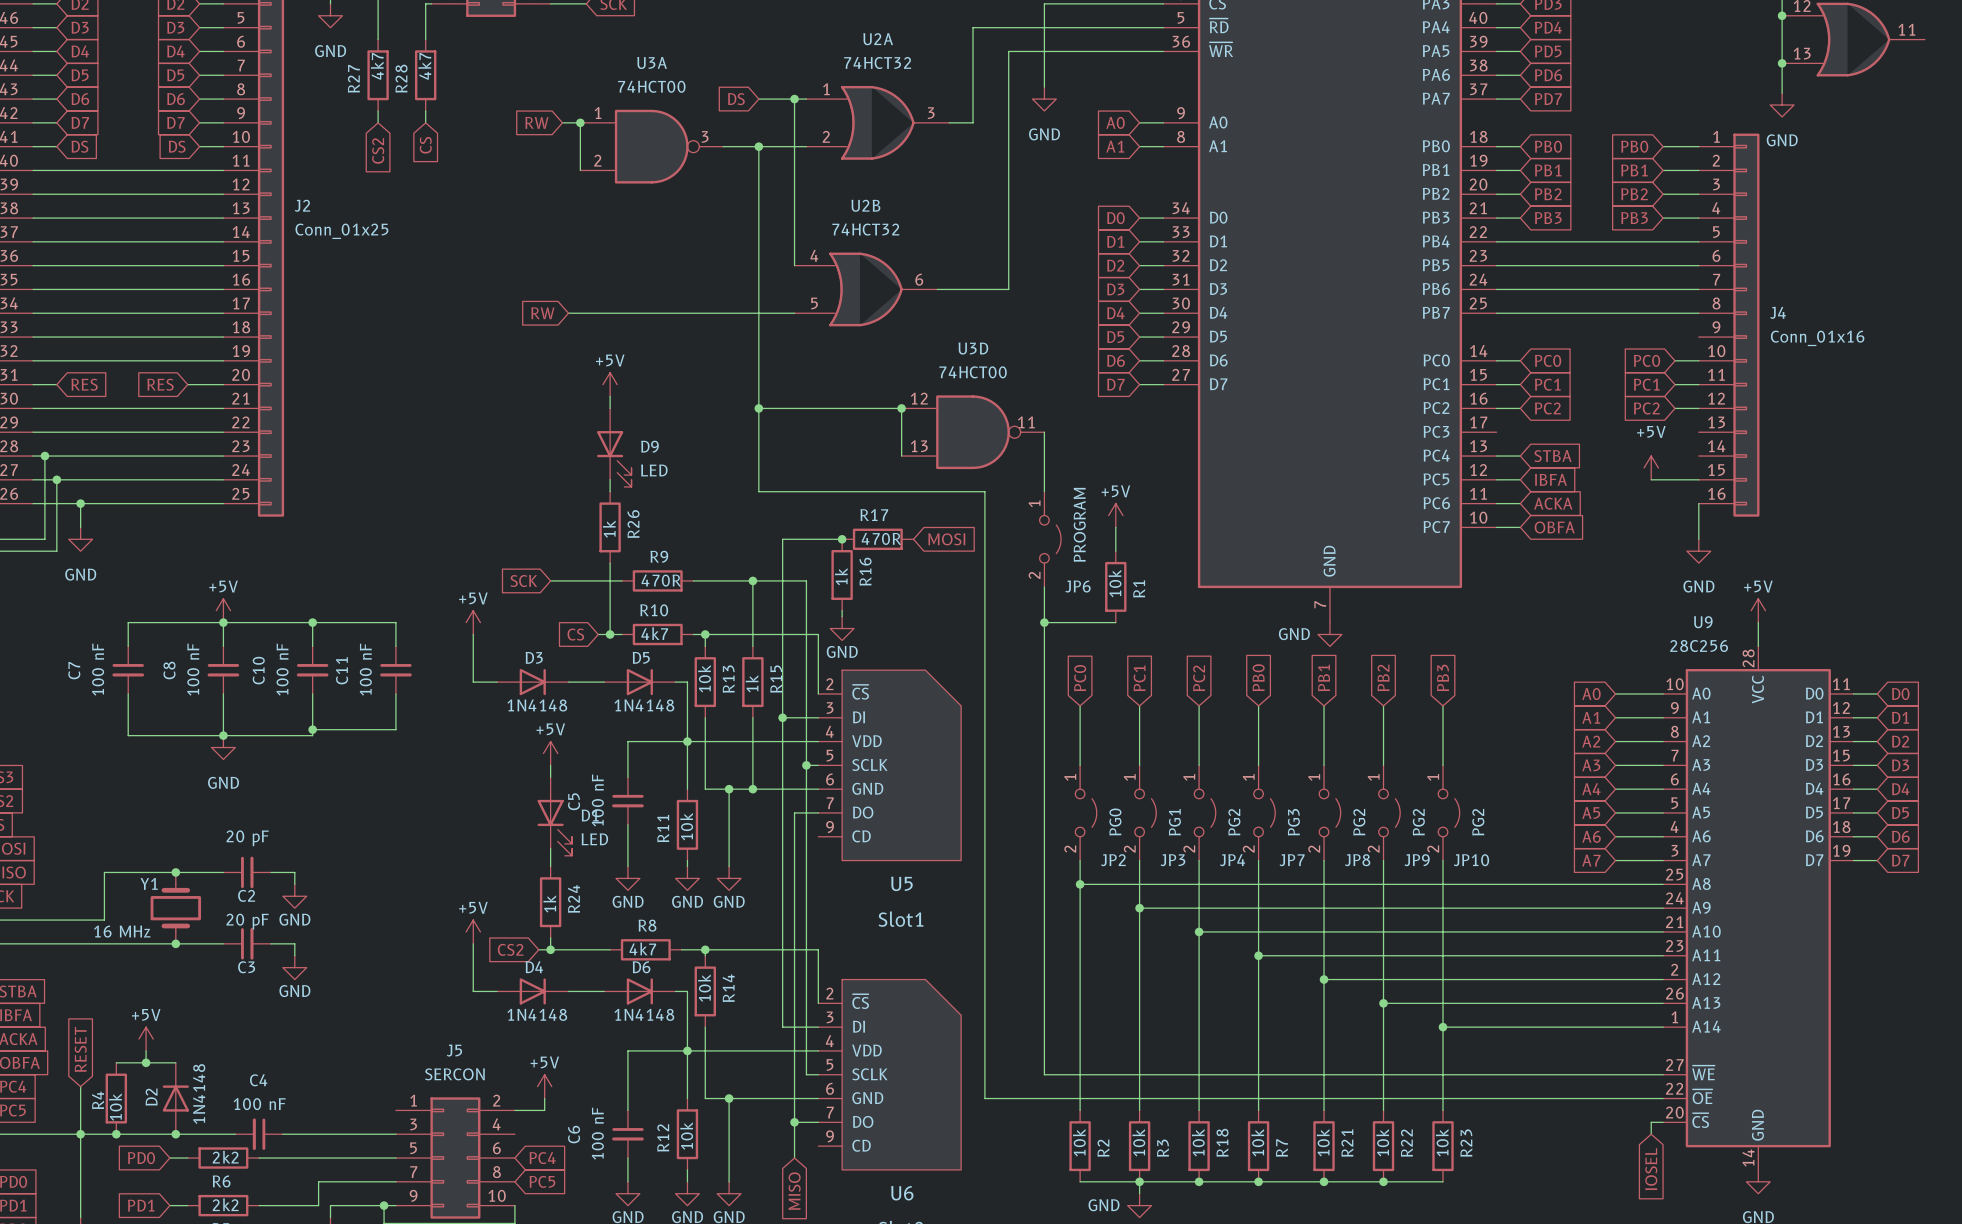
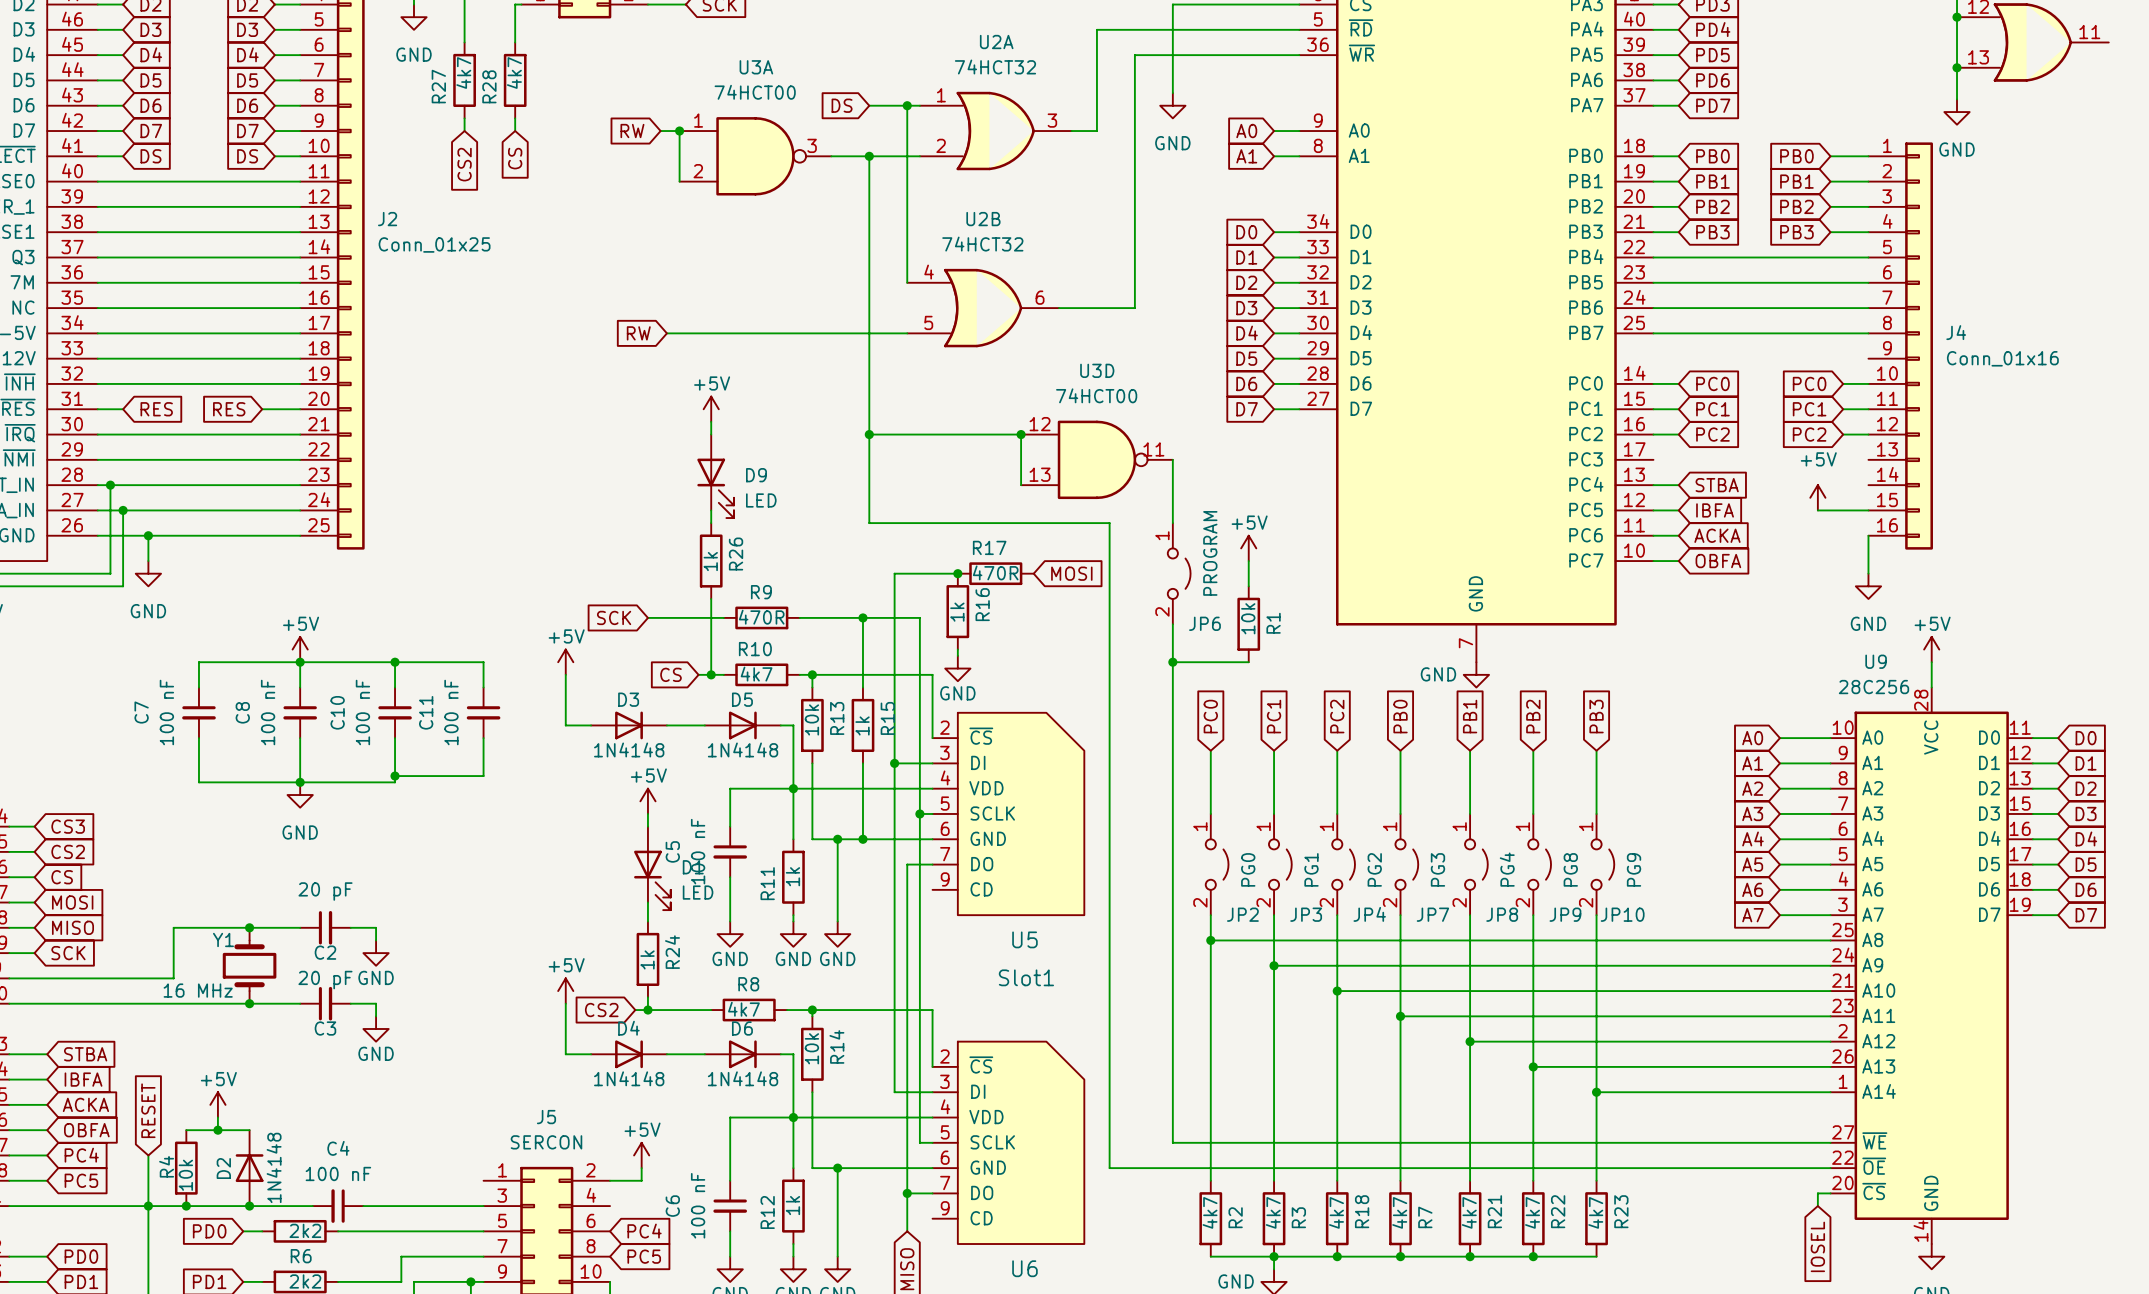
JP8 value: PG2 (1359, 822) -> PG4 (1507, 869)
JP9 value: PG2 (1418, 822) -> PG8 (1570, 869)
JP10 value: PG2 (1478, 822) -> PG9 (1634, 869)
R11 value: 10k (686, 826) -> 1k (792, 876)
R12 value: 10k (686, 1136) -> 1k (792, 1205)
R2 value: 10k (1079, 1142) -> 4k7 (1210, 1212)
R3 value: 10k (1138, 1142) -> 4k7 (1273, 1212)
R18 value: 10k (1198, 1142) -> 4k7 (1336, 1212)
R7 value: 10k (1257, 1142) -> 4k7 (1399, 1212)
R21 value: 10k (1323, 1142) -> 4k7 (1469, 1212)
R22 value: 10k (1382, 1142) -> 4k7 (1532, 1212)
R23 value: 10k (1442, 1142) -> 4k7 (1595, 1212)

